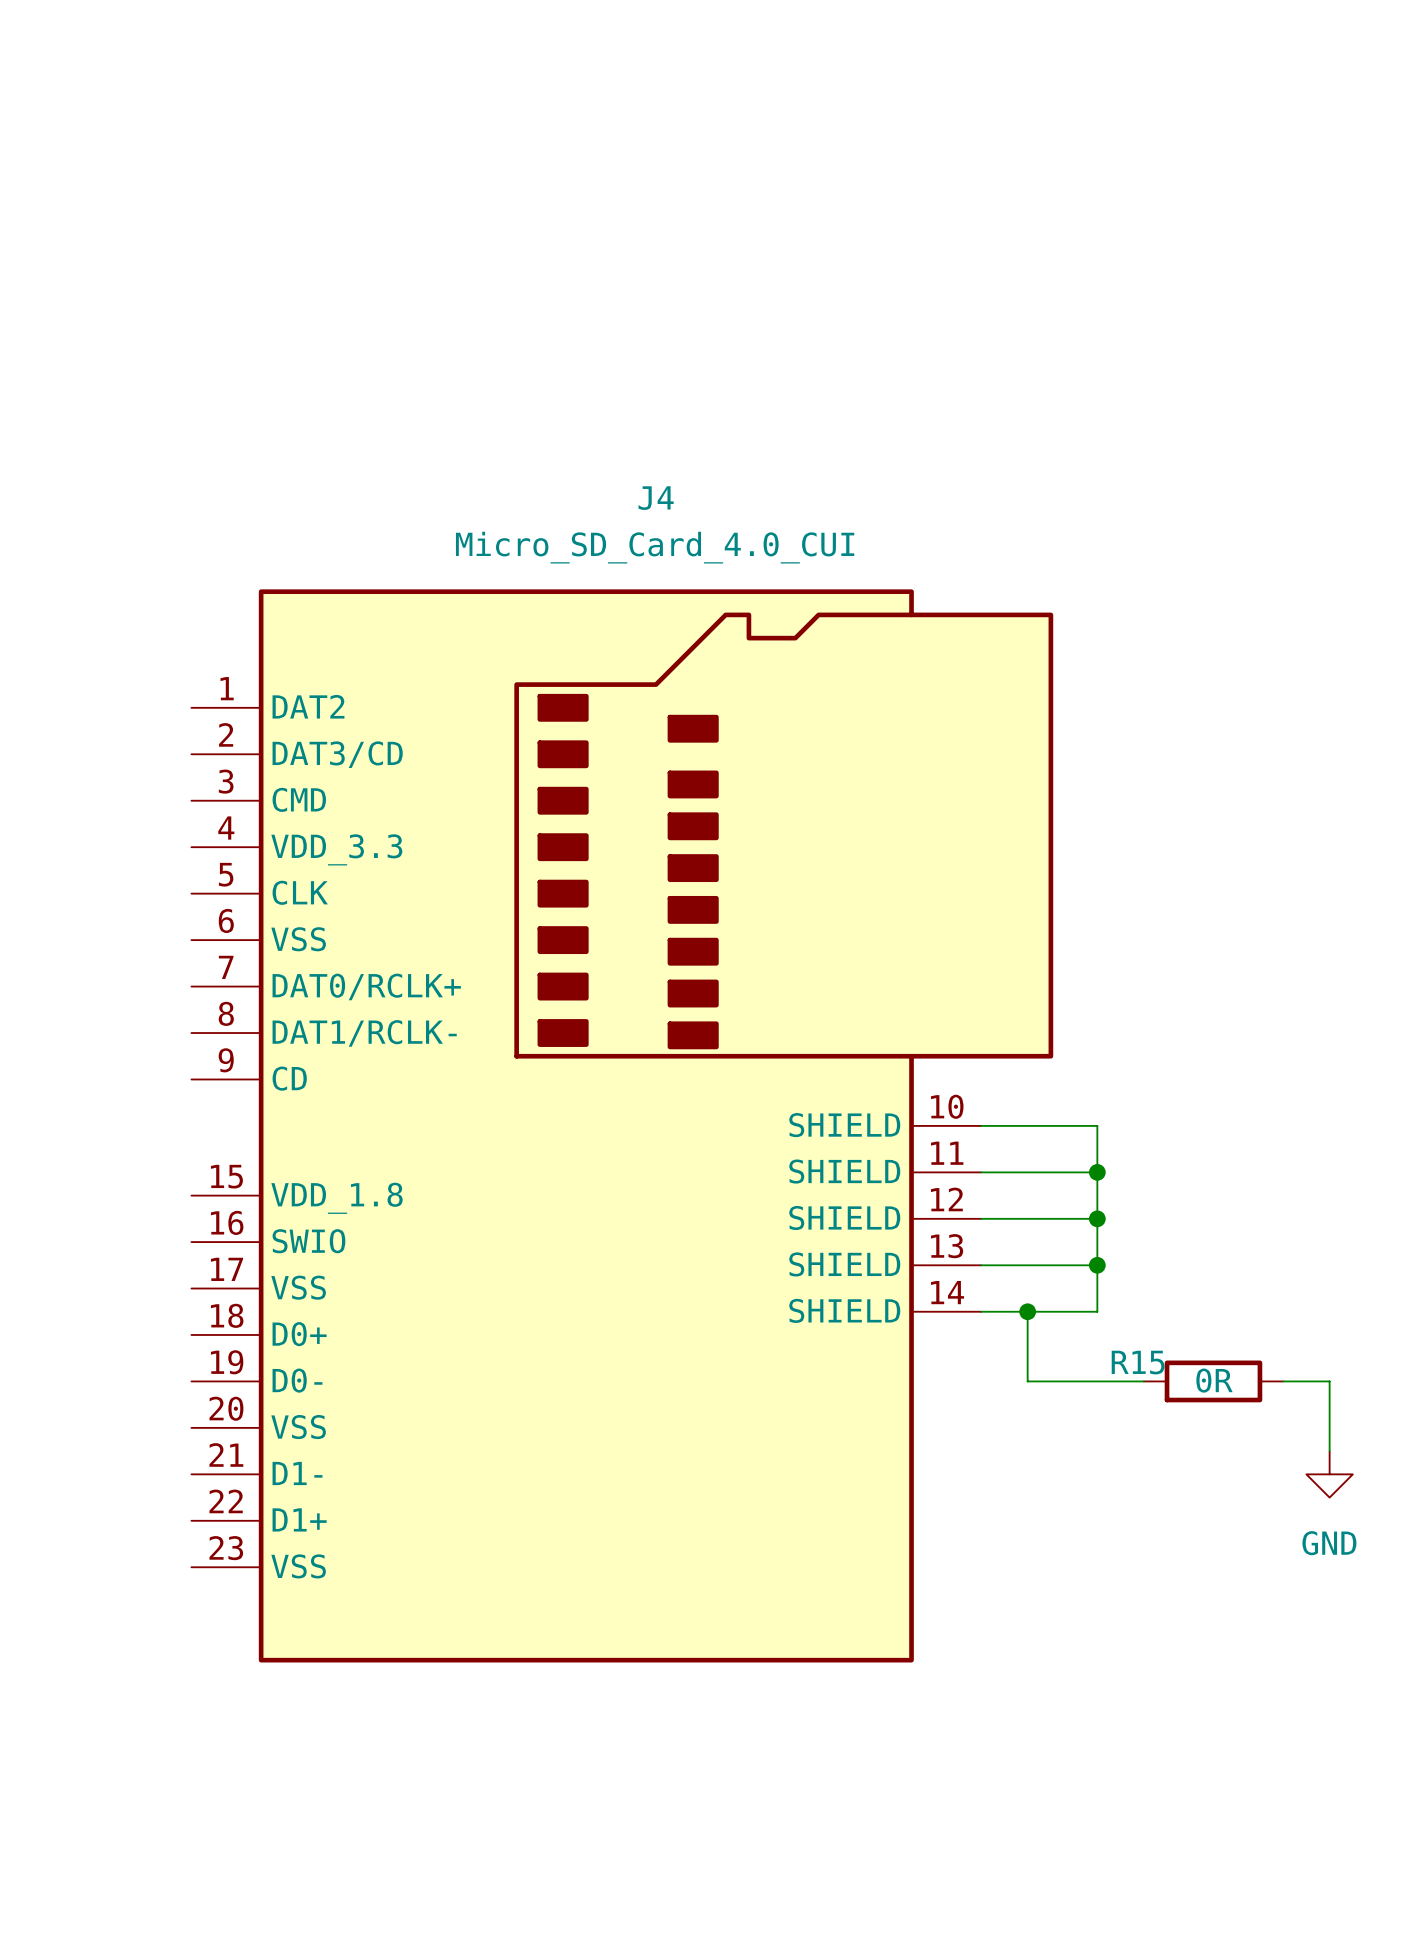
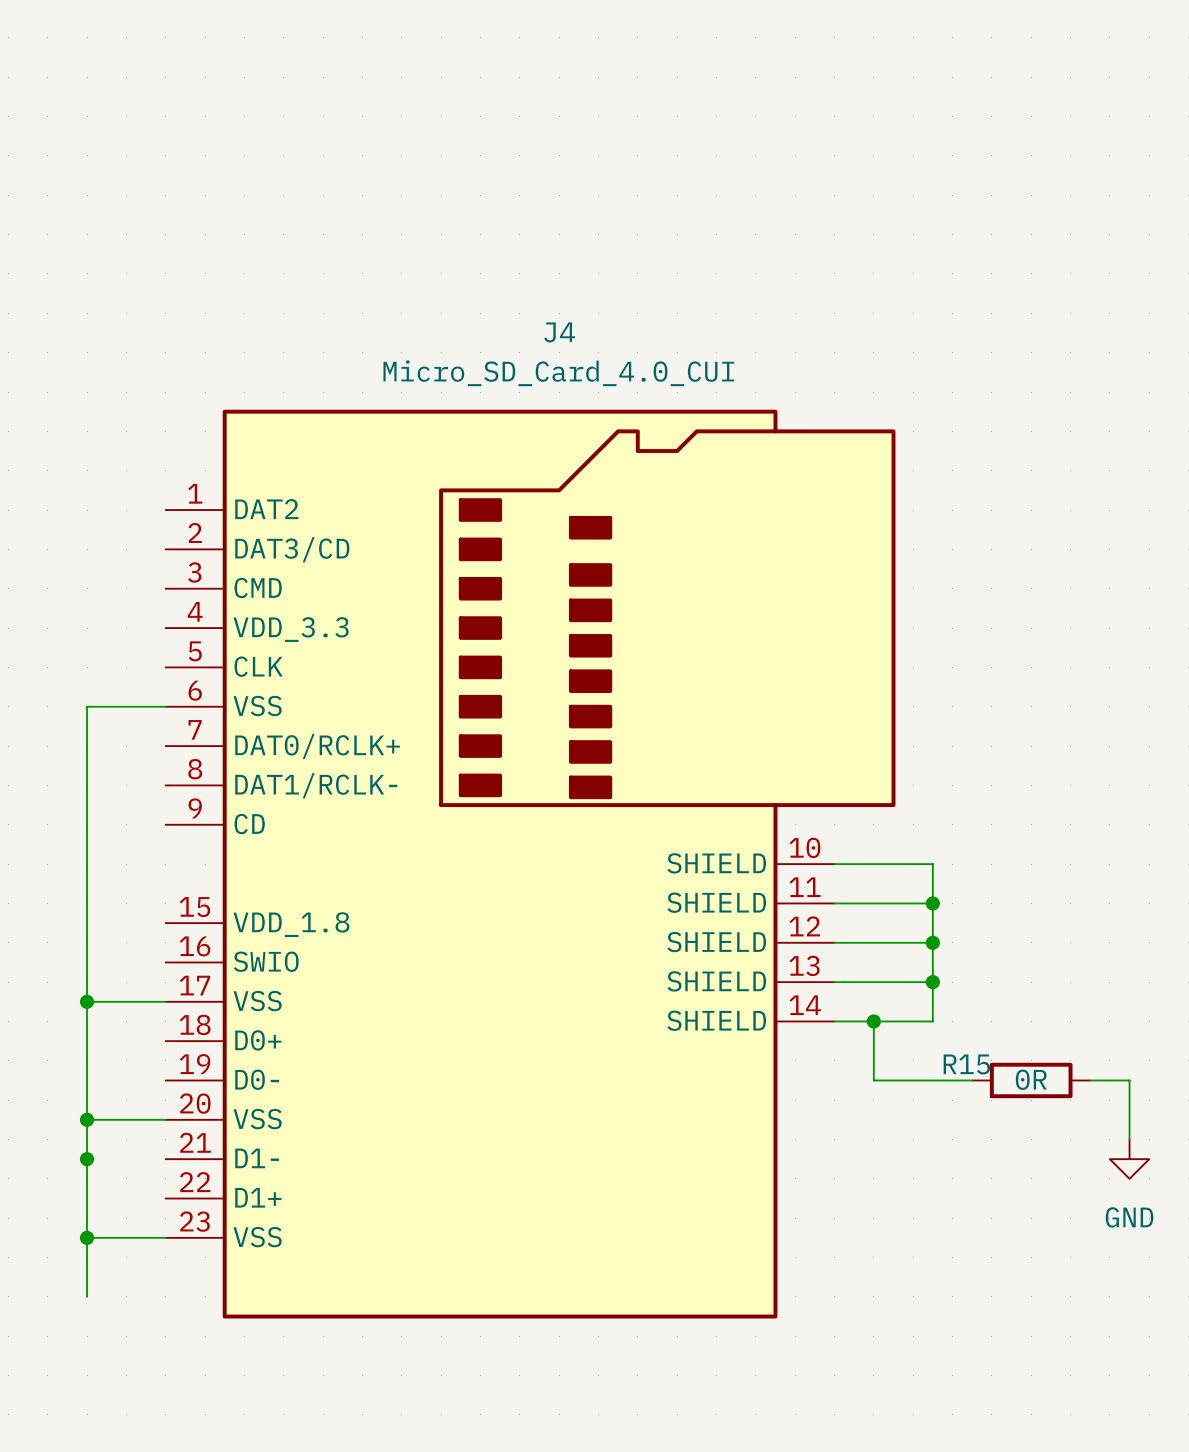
wire: none -> (165, 706) (87, 706) (87, 1296)
wire: none -> (87, 1001) (165, 1001)
junction: none -> (87, 1001)
wire: none -> (87, 1119) (165, 1119)
junction: none -> (87, 1119)
junction: none -> (87, 1159)
wire: none -> (87, 1237) (165, 1237)
junction: none -> (87, 1237)

